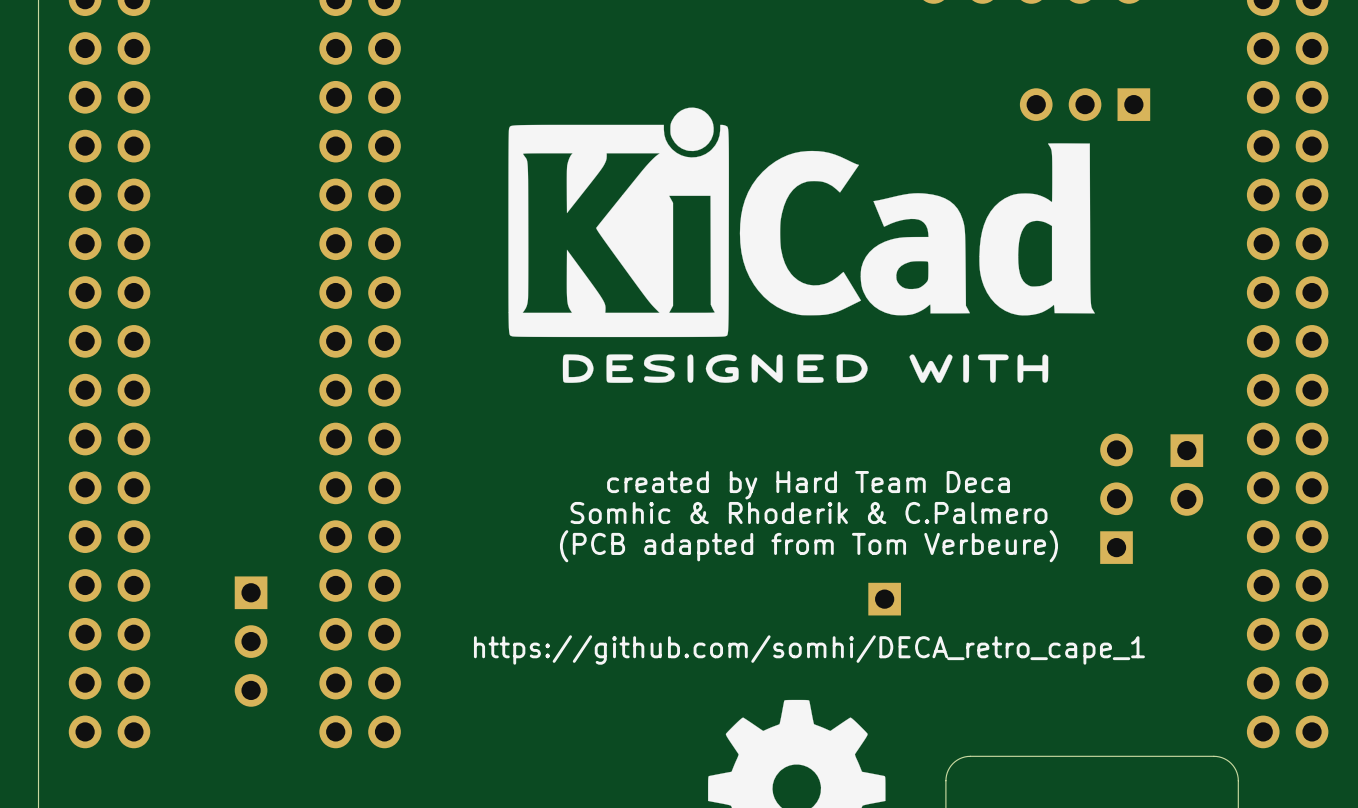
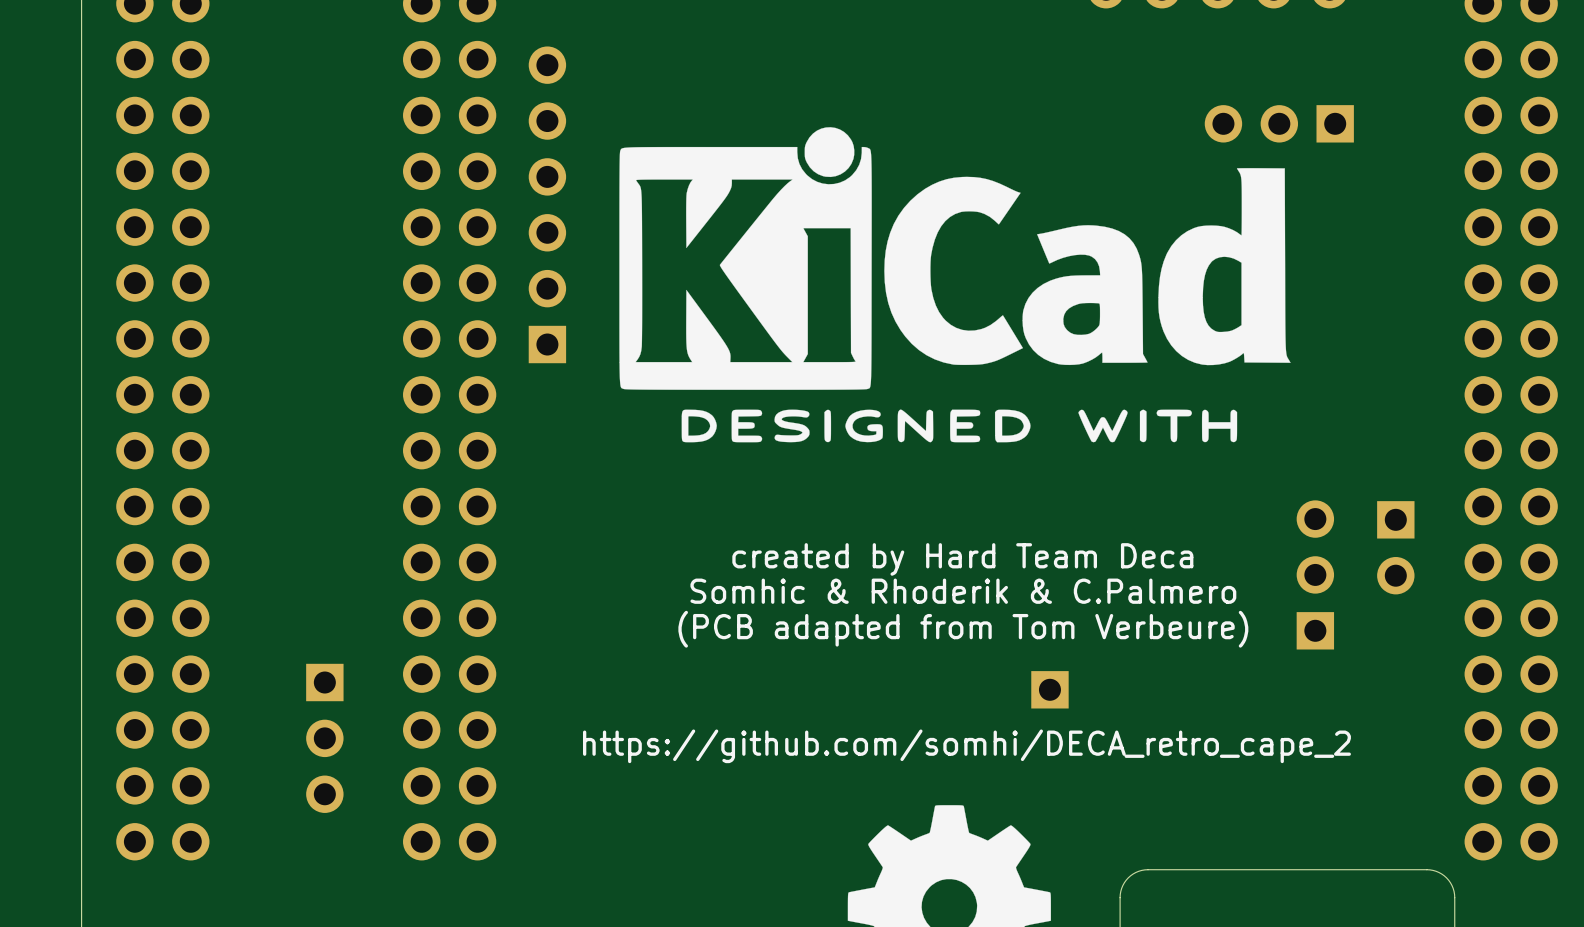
part: none -> (547, 204)
text: https://github.com/somhi/DECA_retro_cape_1 (809, 649) -> https://github.com/somhi/DECA_retro_cape_2 (966, 746)

